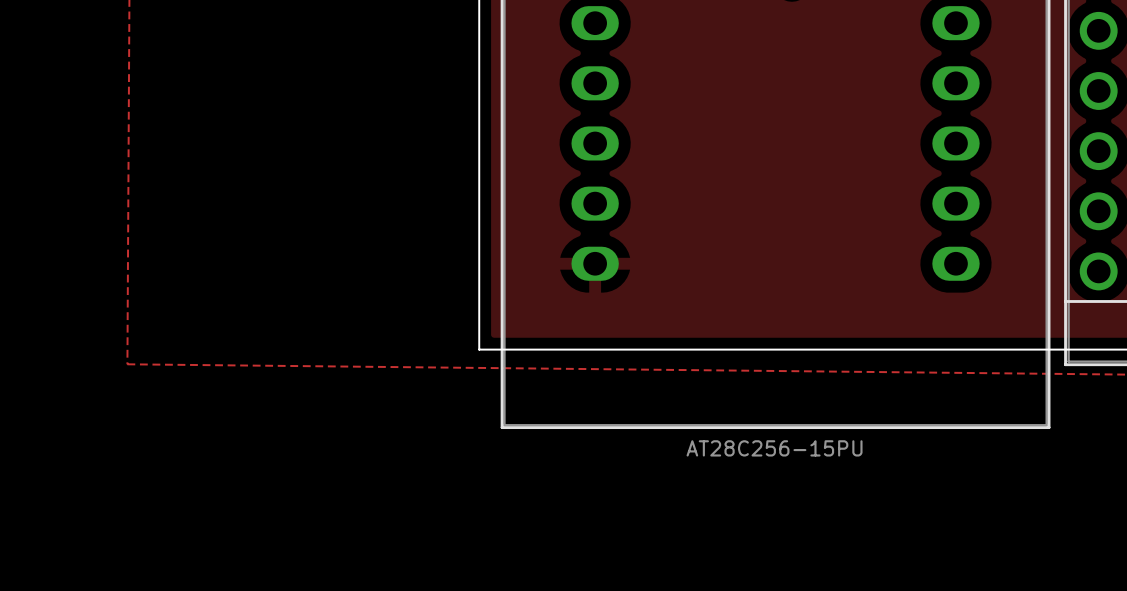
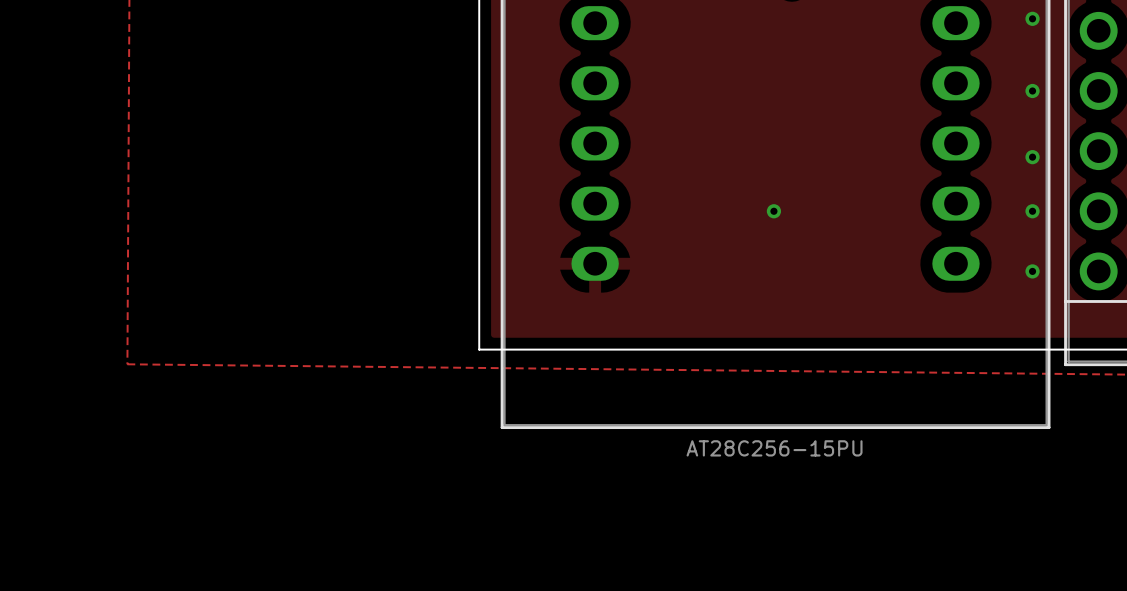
via: none -> (1032, 18)
via: none -> (1032, 90)
via: none -> (1032, 157)
via: none -> (773, 211)
via: none -> (1032, 211)
via: none -> (1032, 271)

